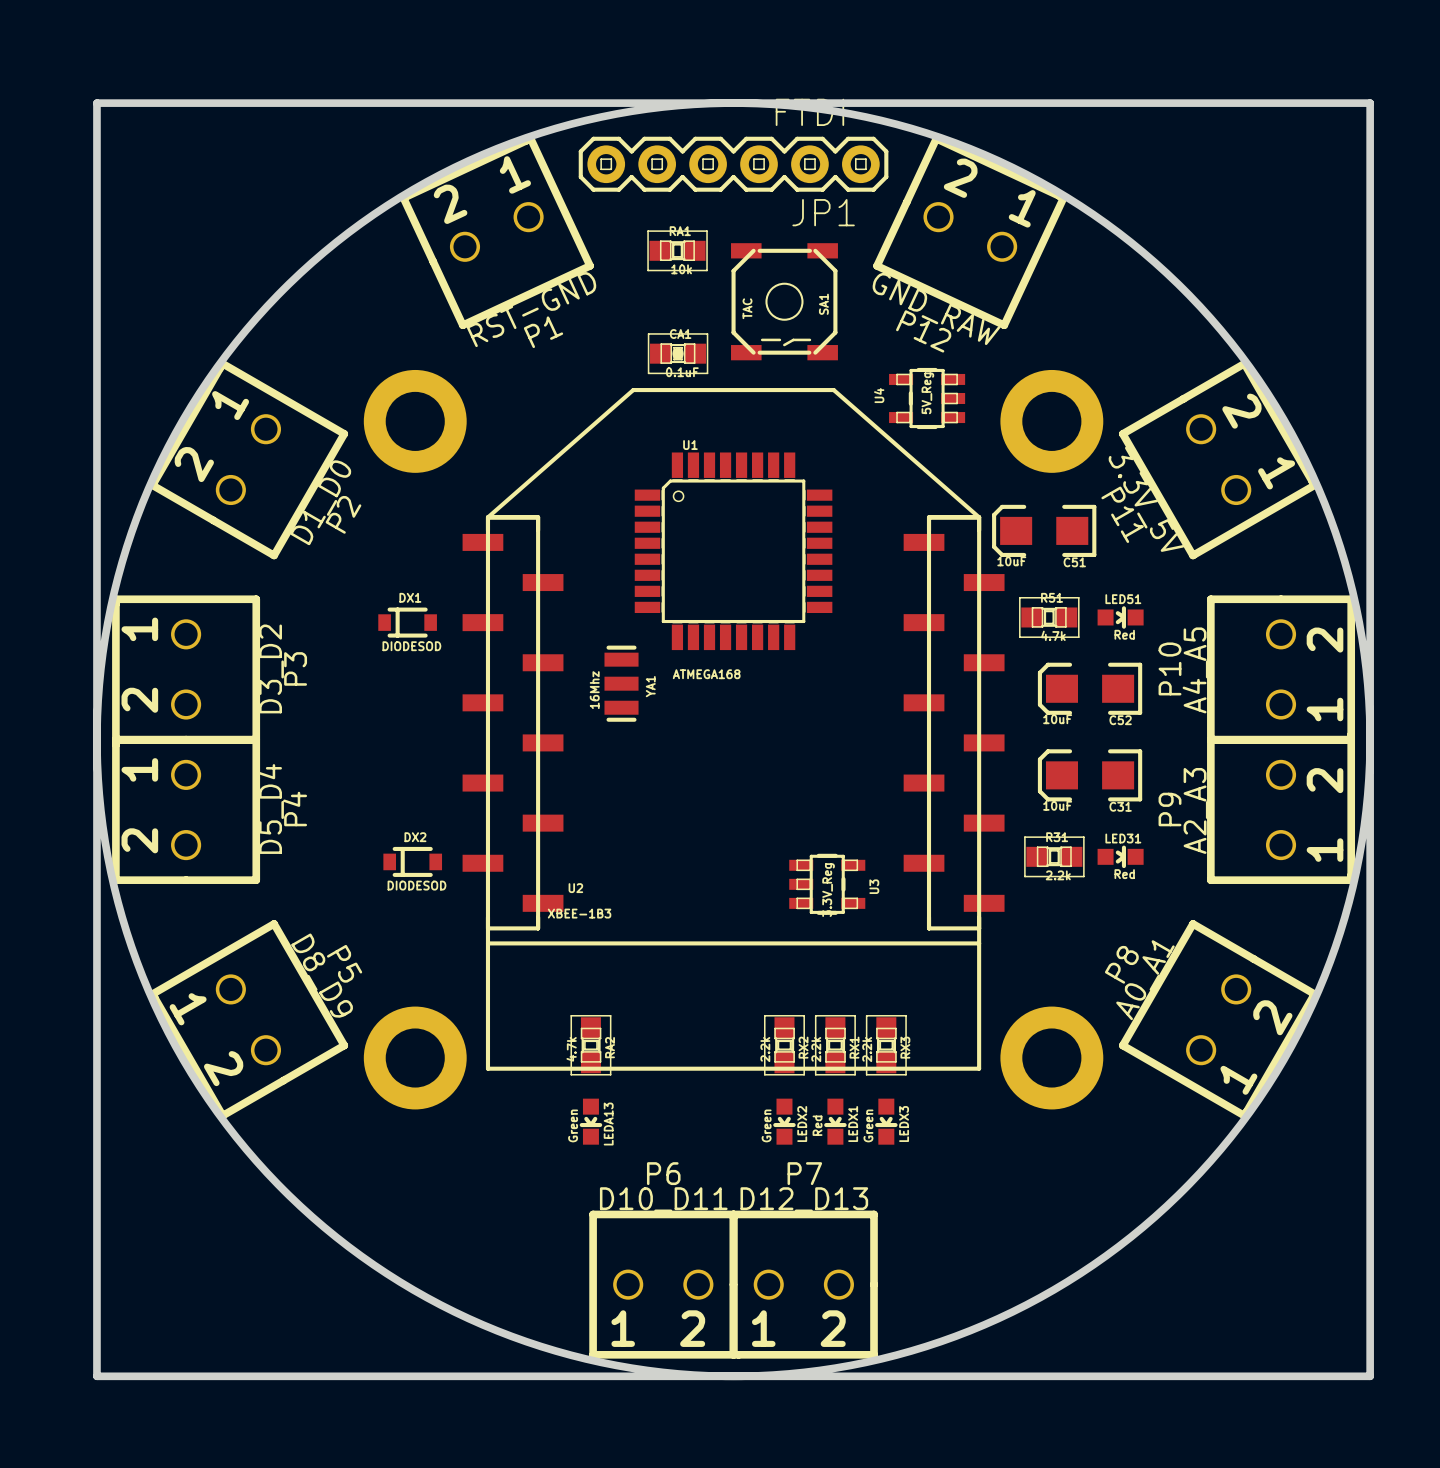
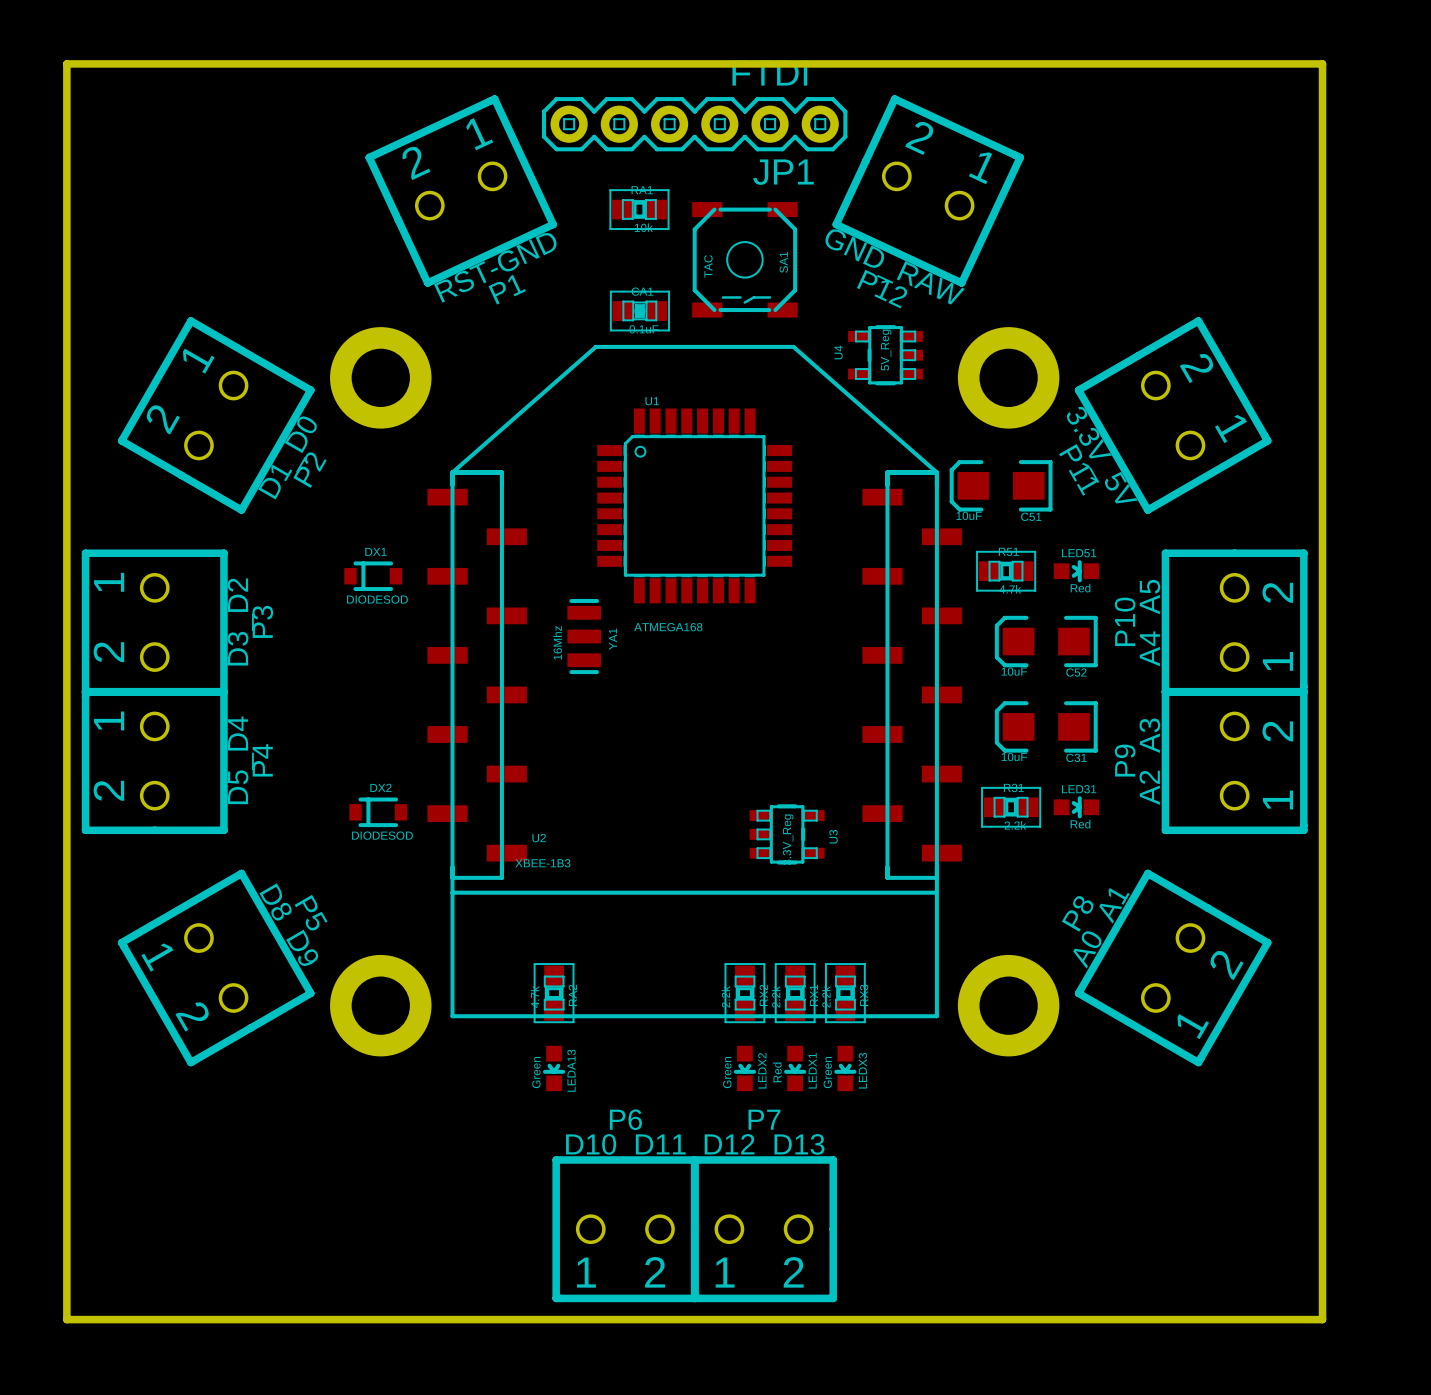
round board edge: [93, 99, 1374, 1381] -> none

